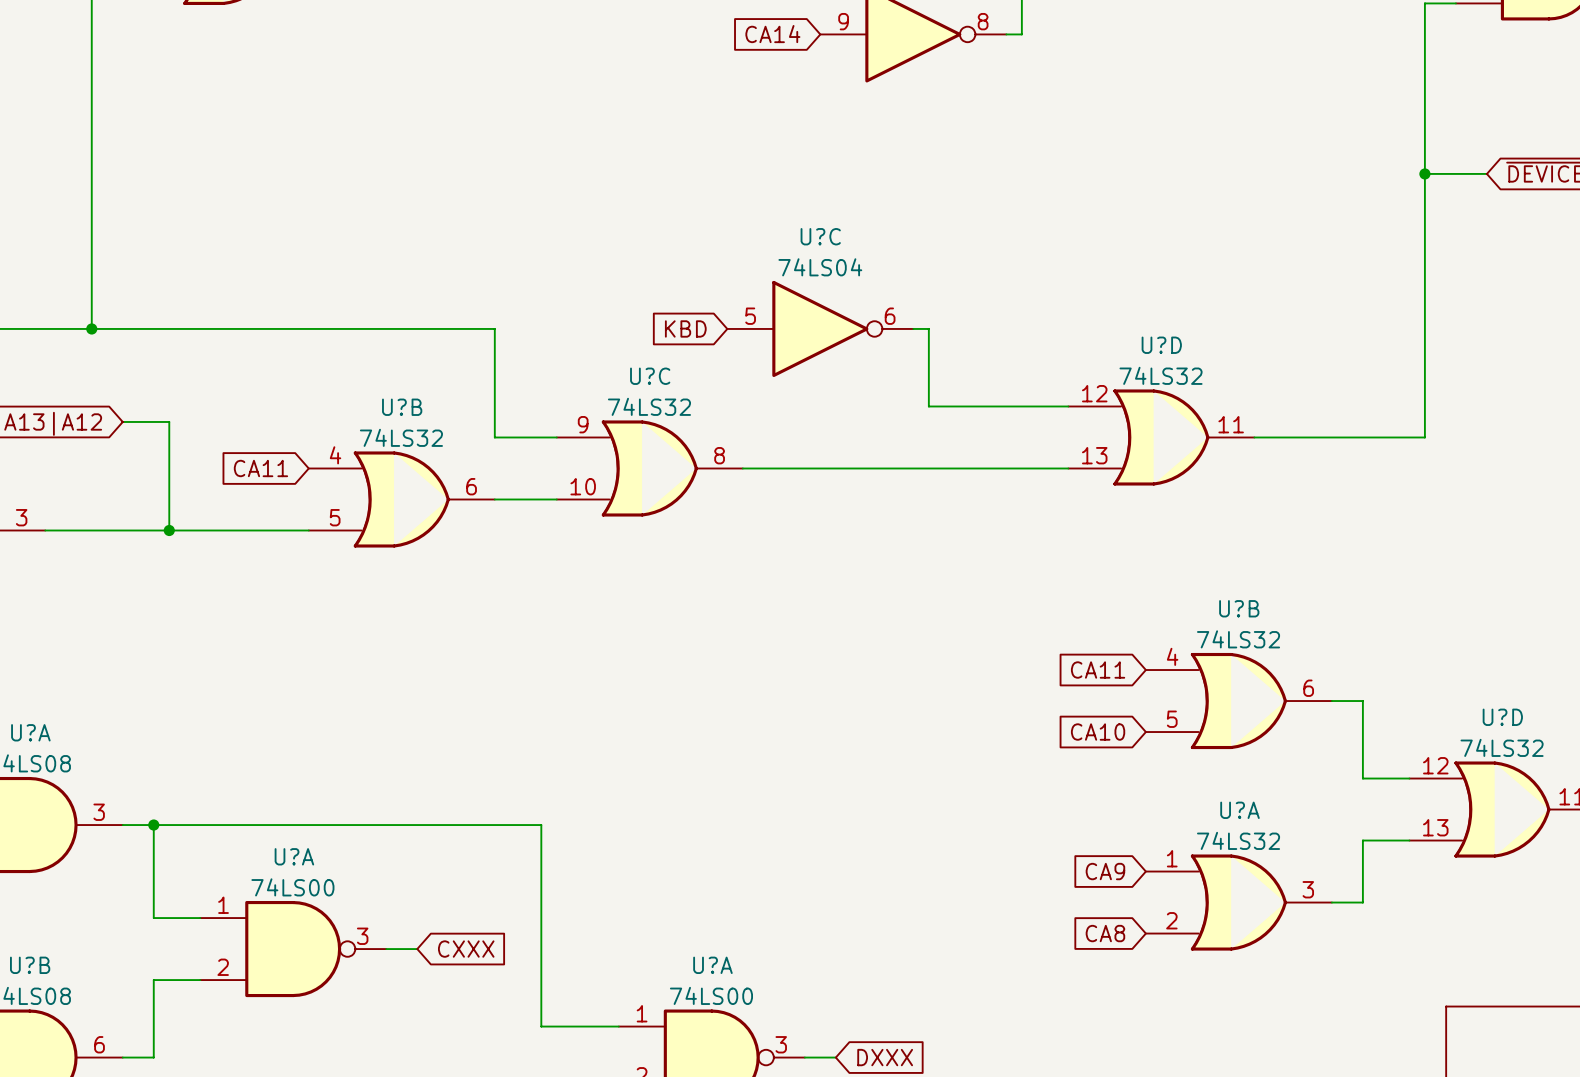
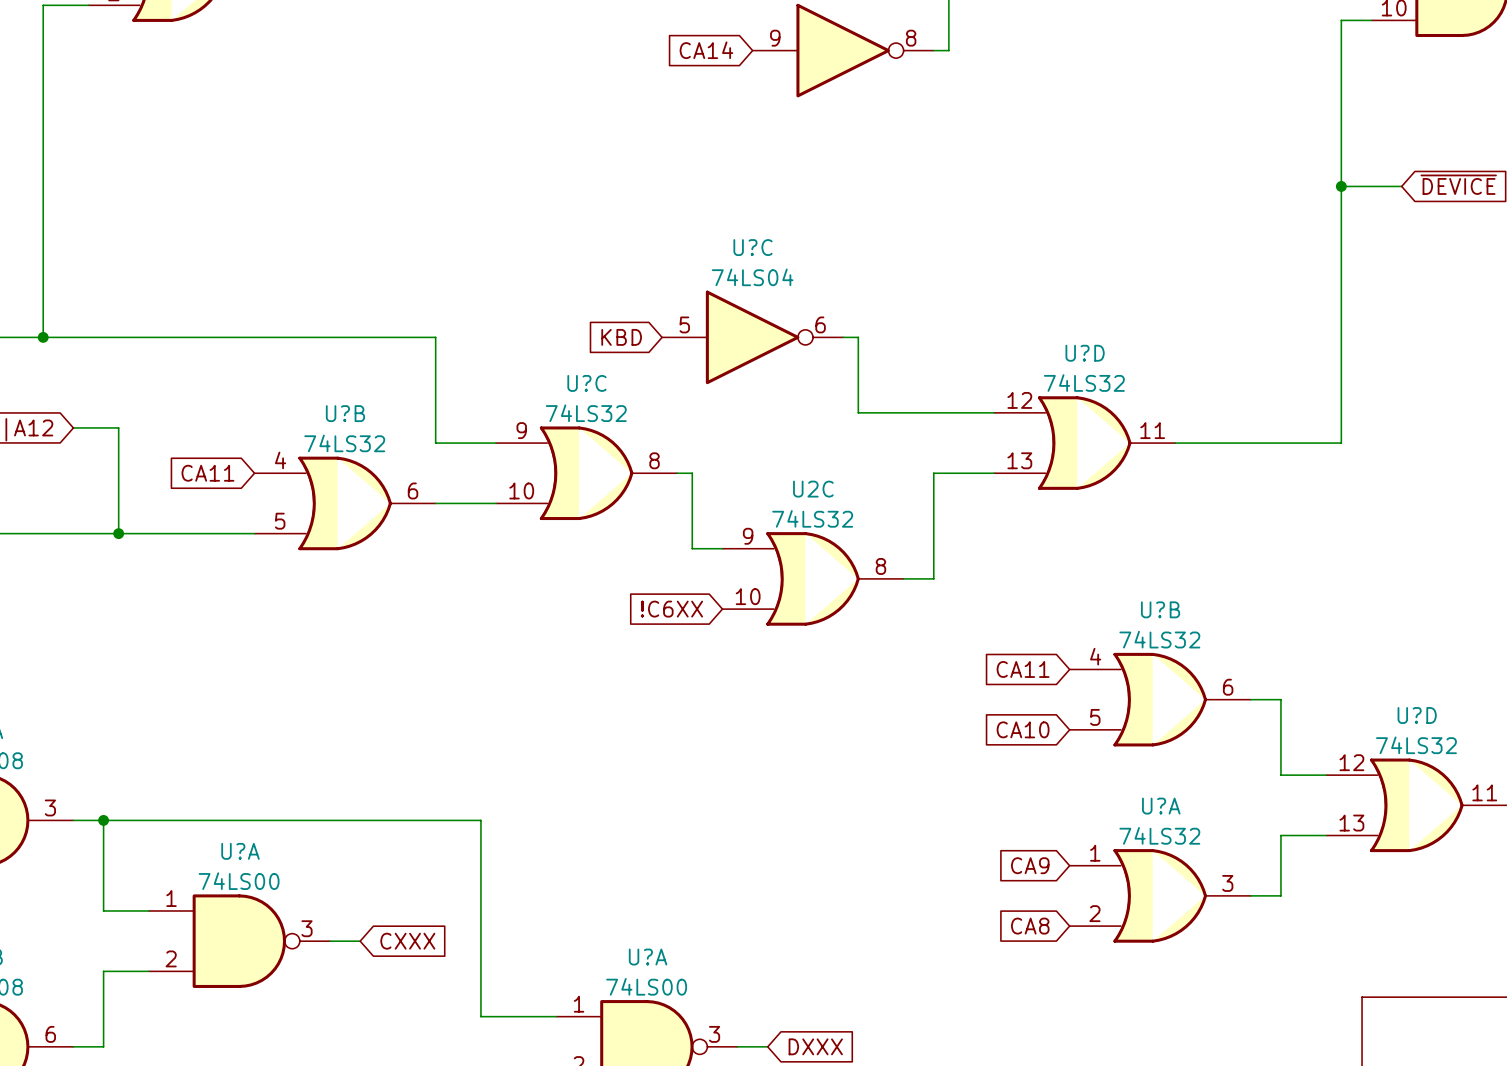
wire: (758, 468) (1006, 468) -> (692, 473) (692, 548) (722, 548)
wire: none -> (933, 473) (933, 578) (903, 578)
U2C: none -> 74LS32 (813, 578)
global label: none -> !C6XX (671, 609)

